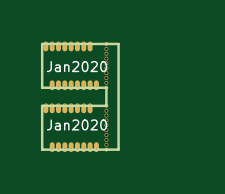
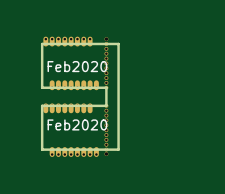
via: none -> (106, 39)
part: none -> (45, 41)
part: none -> (52, 41)
part: none -> (58, 41)
part: none -> (64, 41)
part: none -> (71, 41)
part: none -> (77, 41)
part: none -> (83, 41)
part: none -> (90, 41)
part: (45, 46) -> none
part: (52, 46) -> none
part: (58, 46) -> none
part: (64, 46) -> none
part: (71, 46) -> none
part: (77, 46) -> none
part: (83, 46) -> none
part: (90, 46) -> none
text: Jan2020 (76, 66) -> Feb2020 (77, 66)
text: Jan2020 (76, 124) -> Feb2020 (77, 124)
part: (52, 147) -> none
part: (58, 147) -> none
part: (64, 147) -> none
part: (71, 147) -> none
part: (77, 147) -> none
part: (83, 147) -> none
part: (90, 147) -> none
part: (96, 147) -> none
part: none -> (52, 152)
part: none -> (58, 152)
part: none -> (64, 152)
part: none -> (71, 152)
part: none -> (77, 152)
part: none -> (83, 152)
part: none -> (90, 152)
part: none -> (96, 152)
via: none -> (106, 154)

